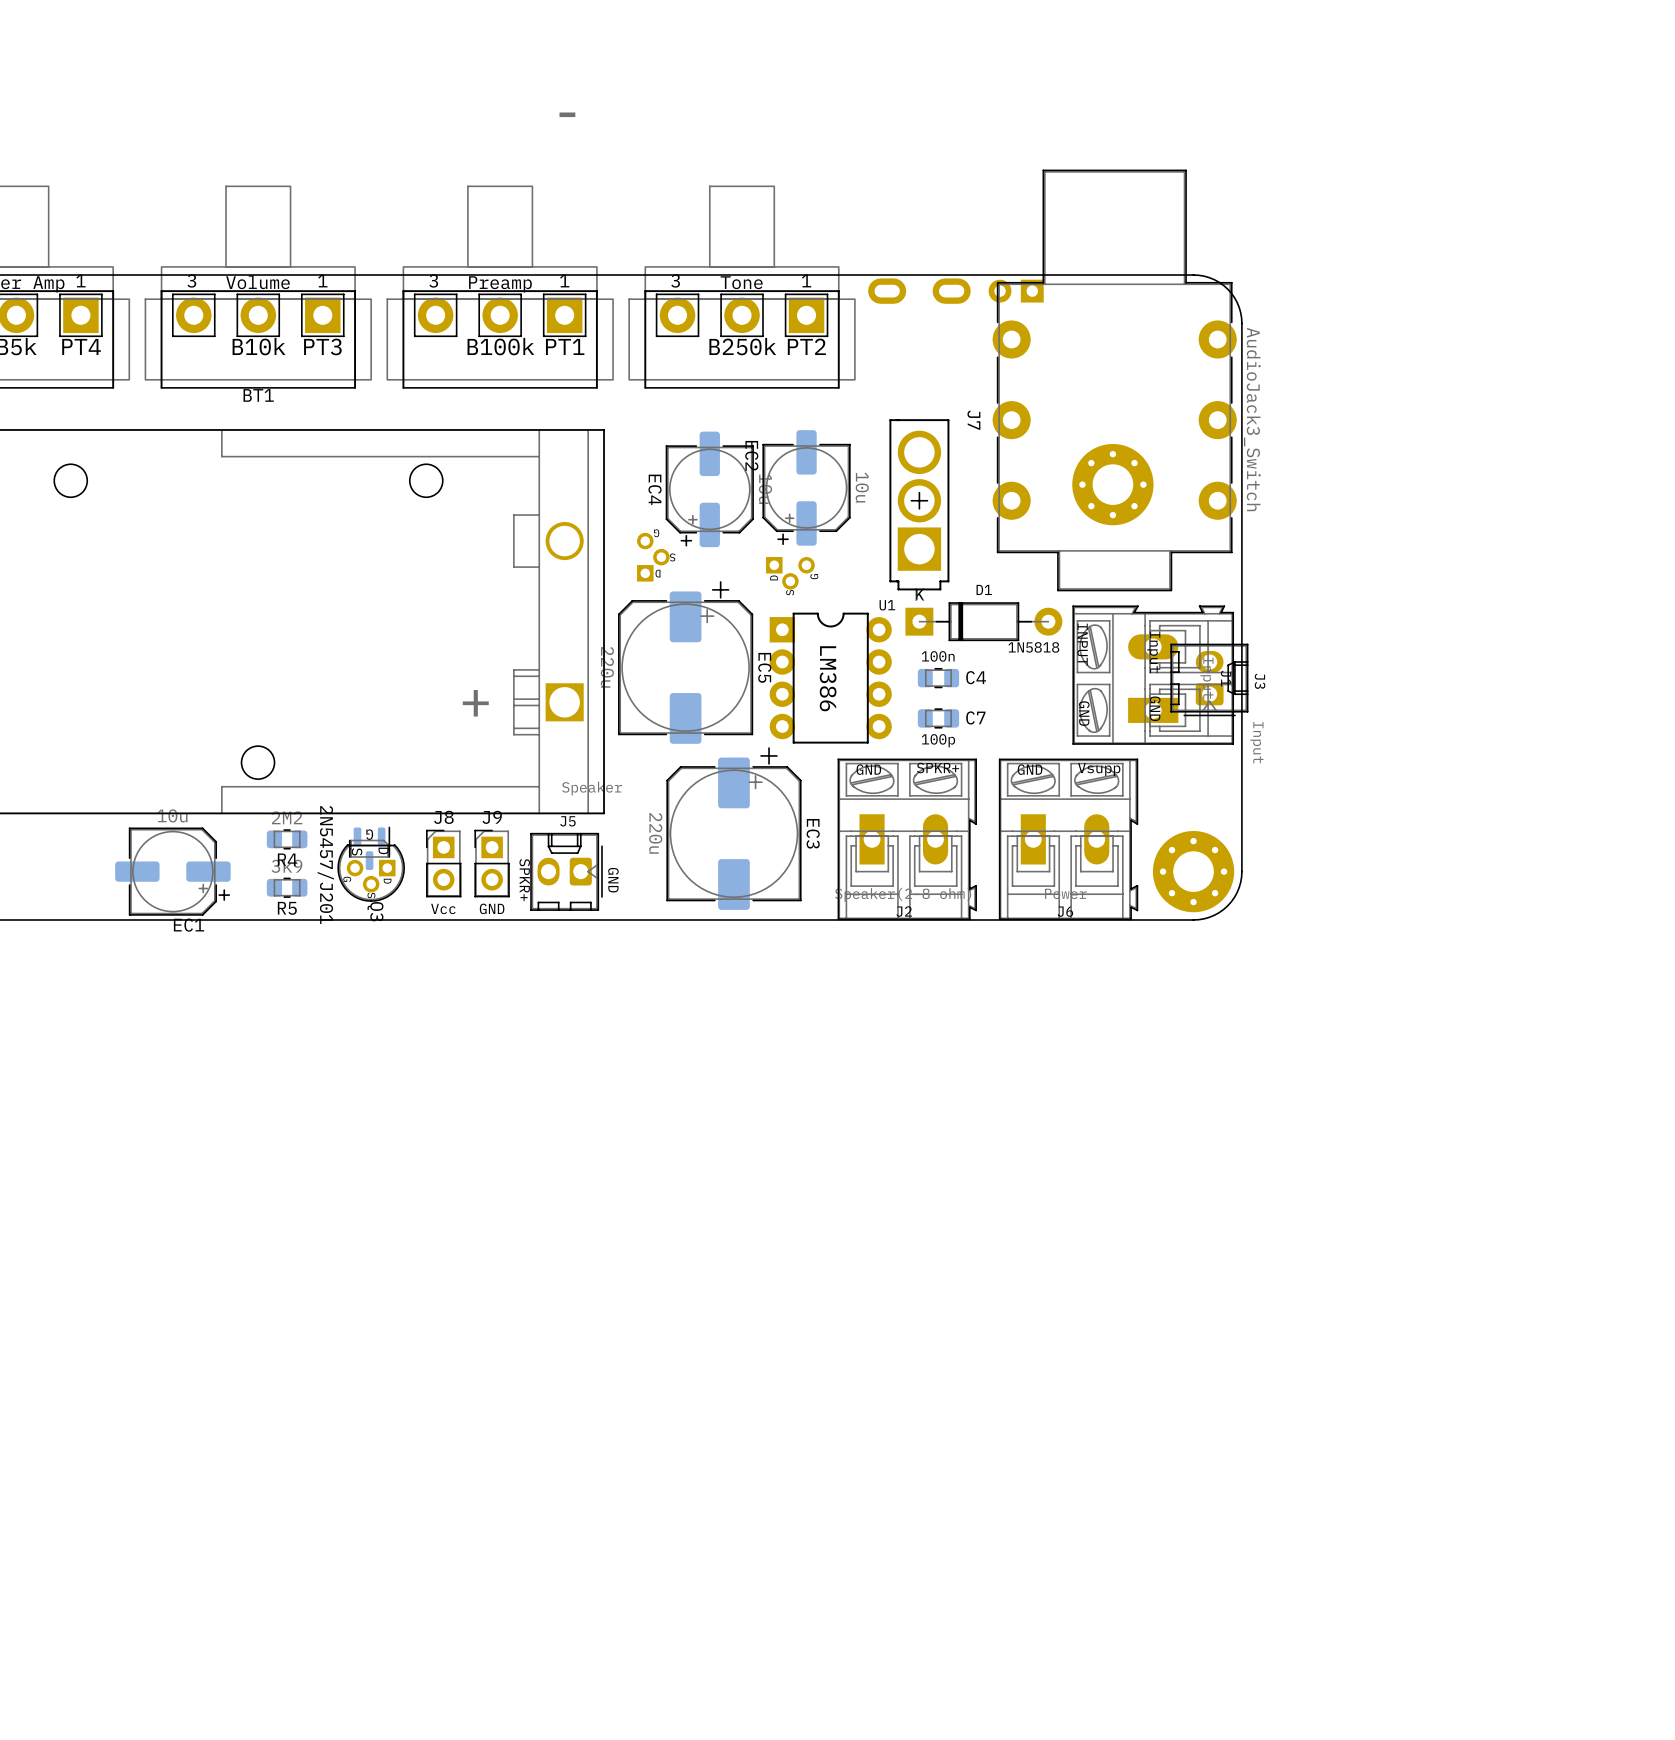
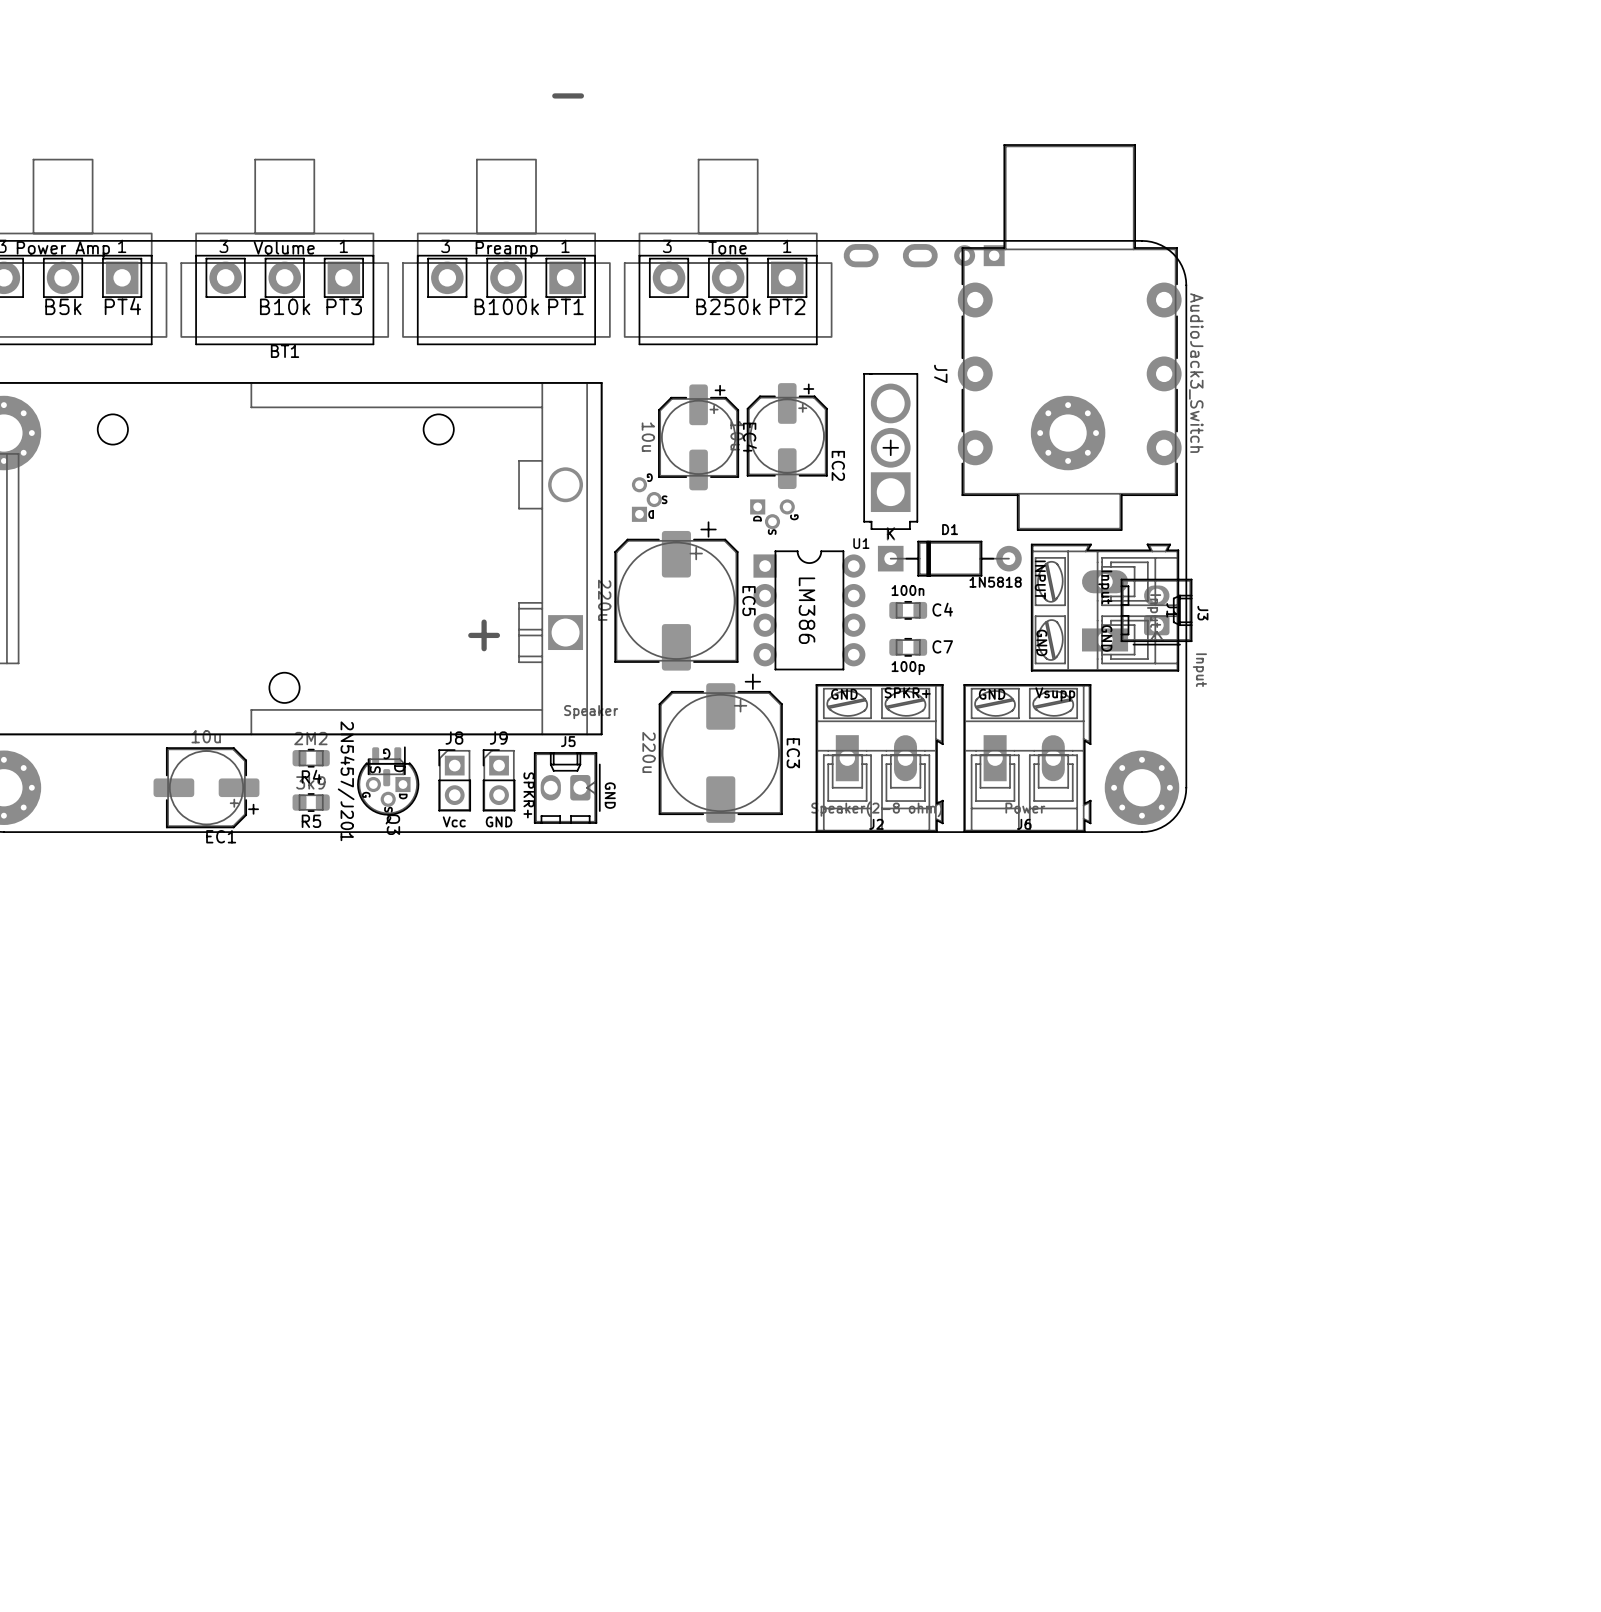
EC2 rotation: 0° (806, 487) -> 180° (787, 436)
EC4 rotation: 0° (709, 489) -> 180° (698, 437)

